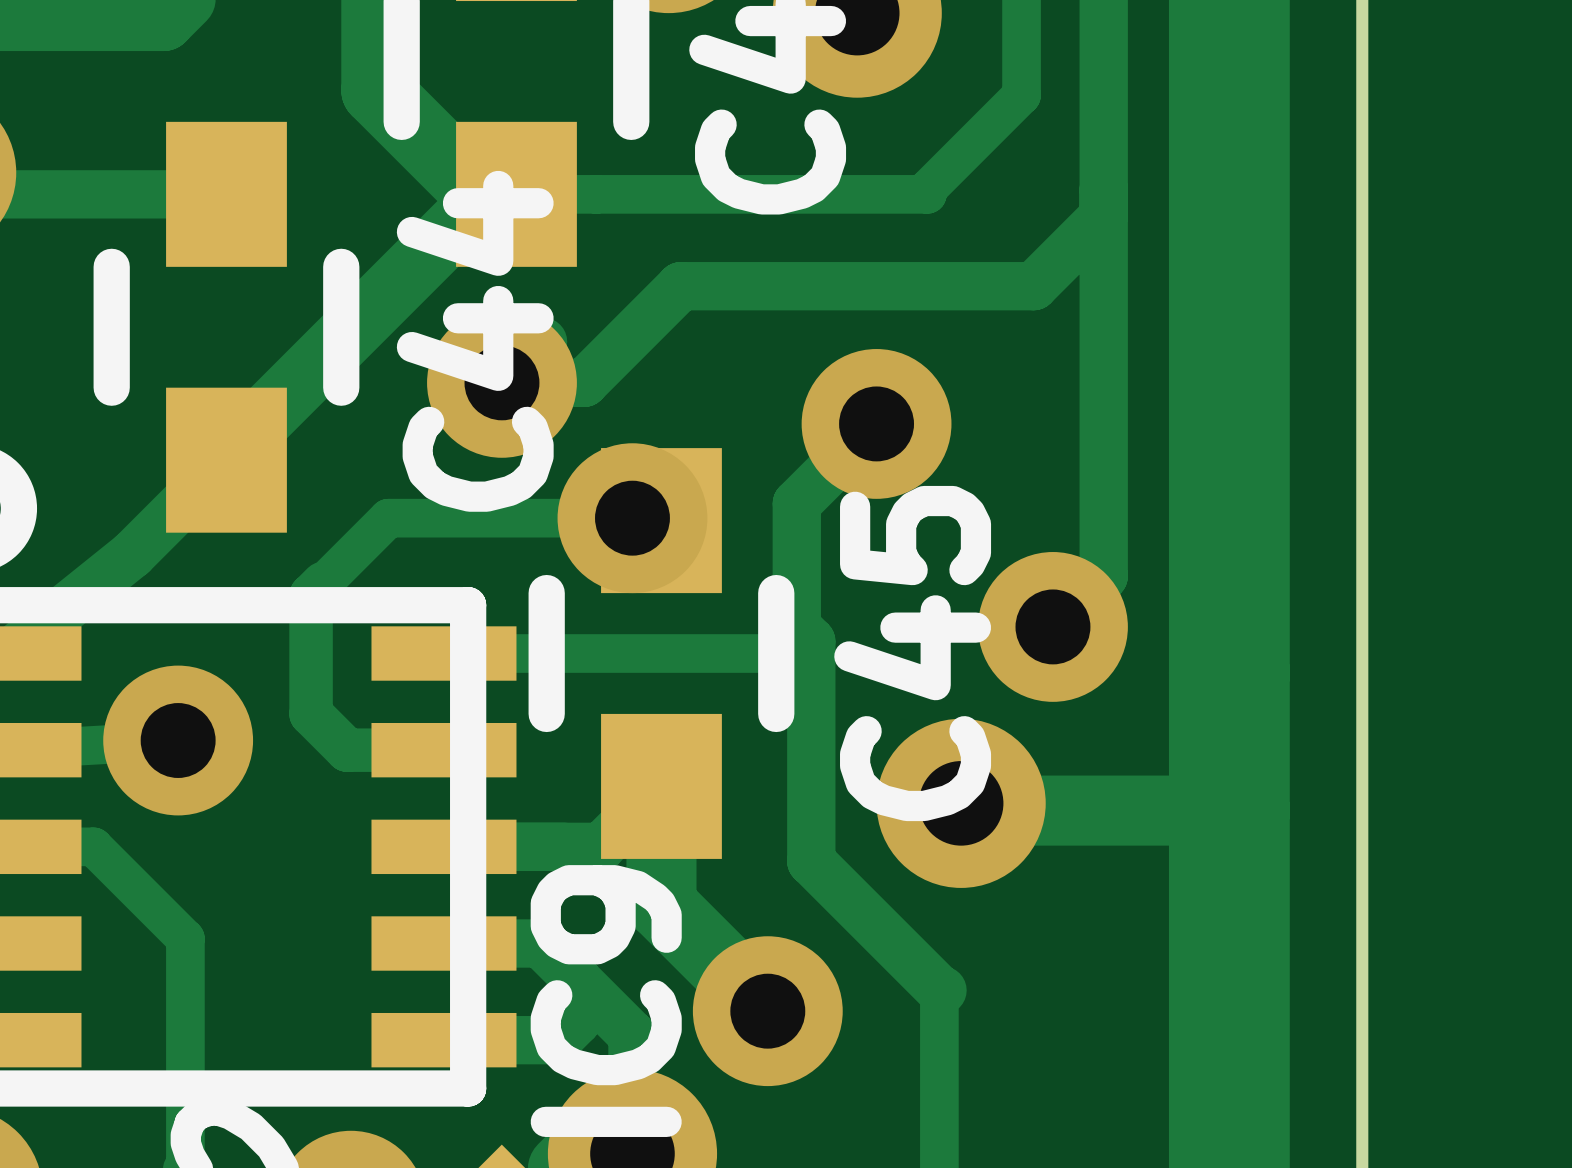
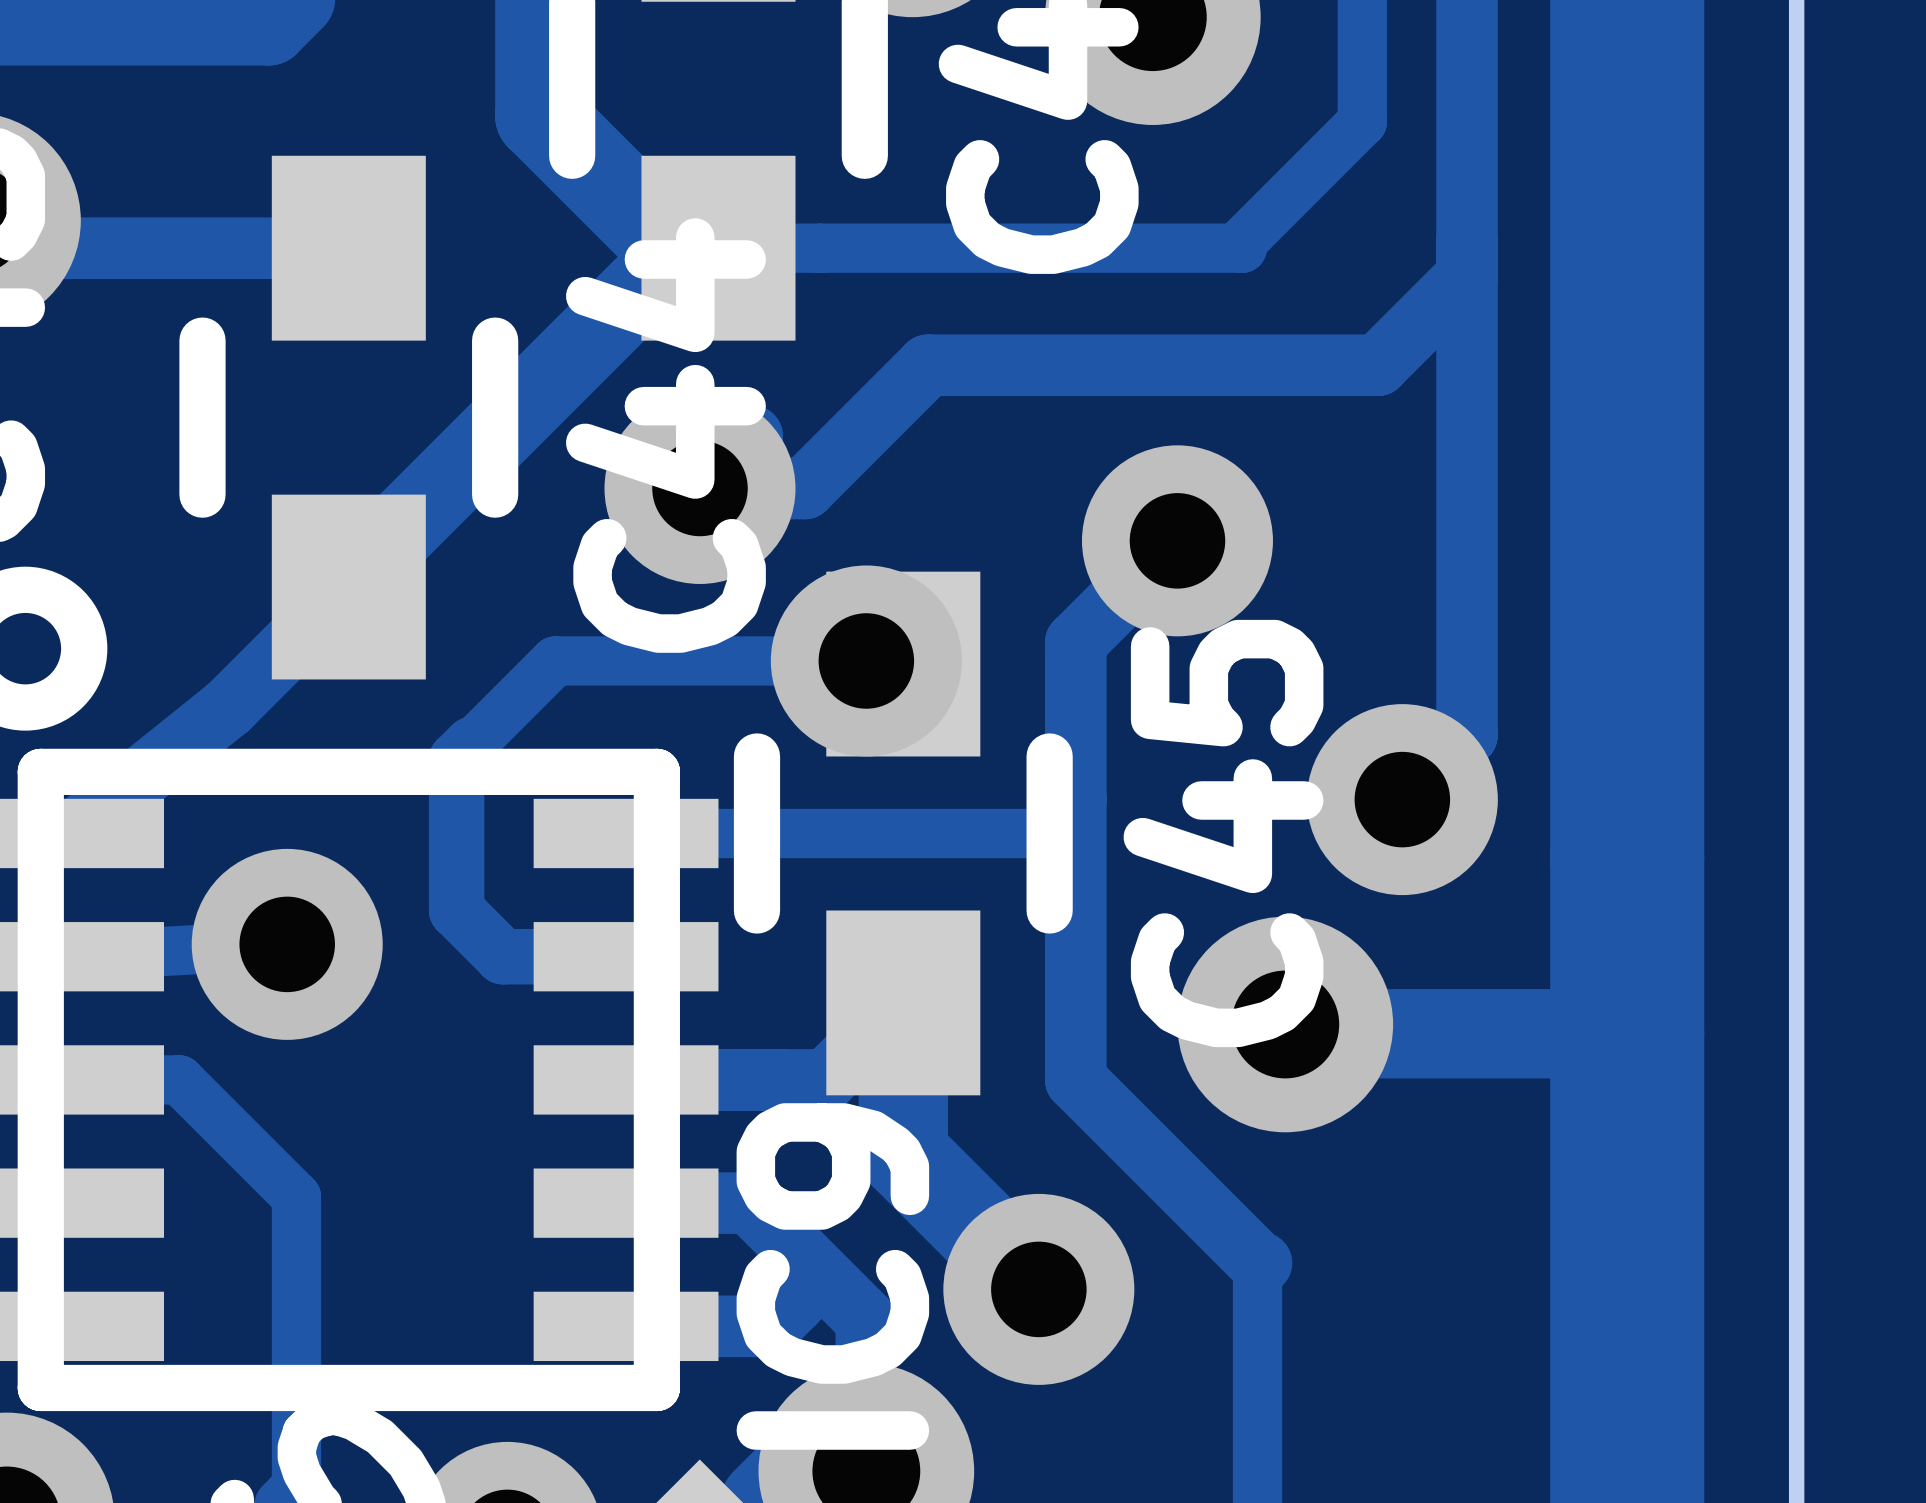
track: (796, 626) (811, 641) (811, 861) -> (1075, 799) (1075, 1079) (1094, 1098)

